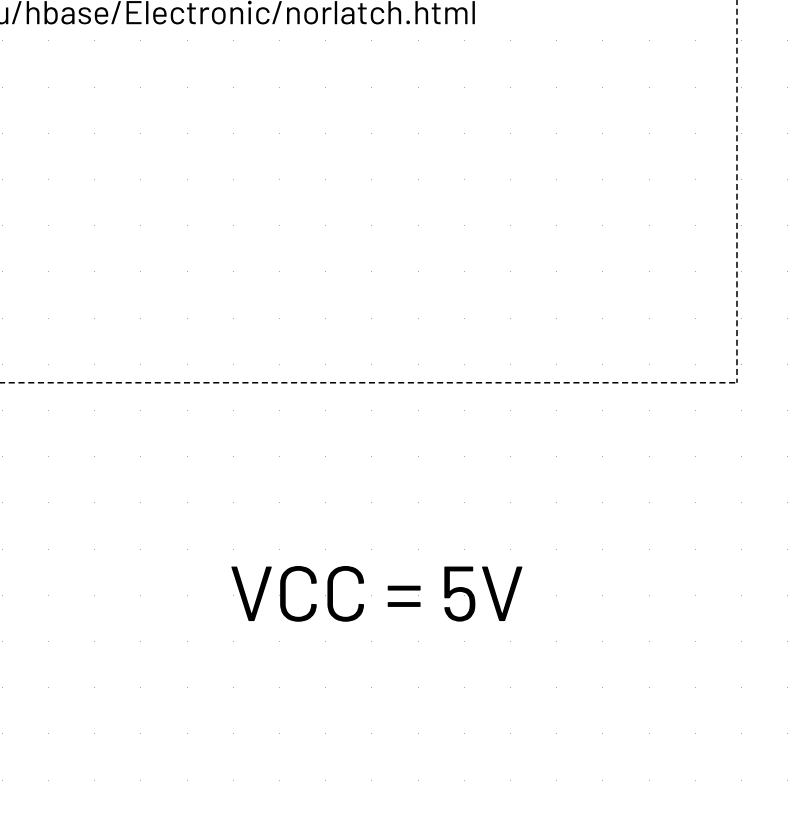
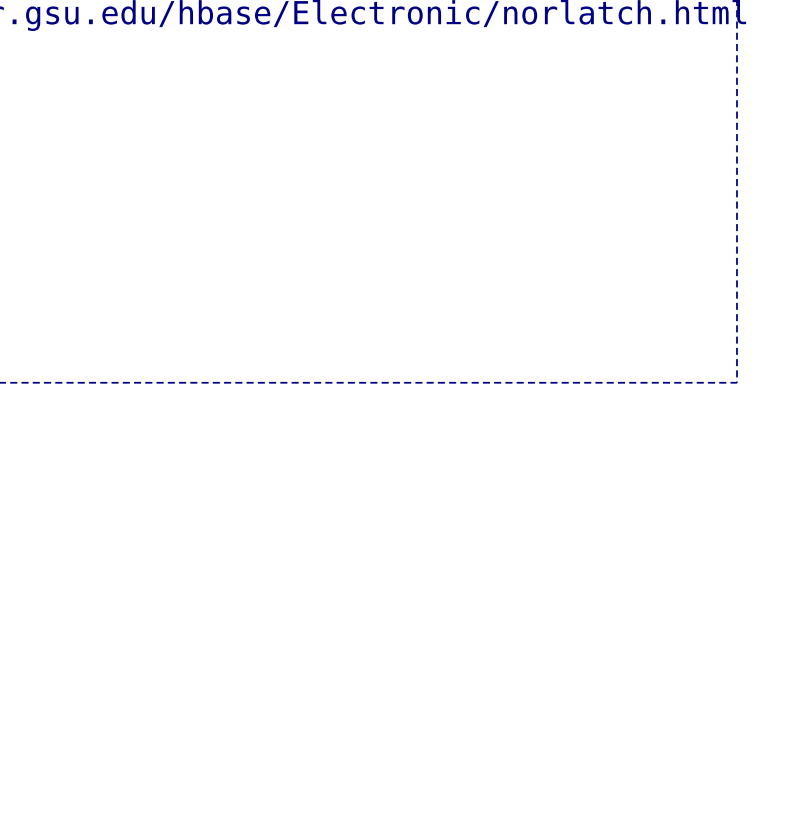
text: VCC = 5V (376, 593) -> none

